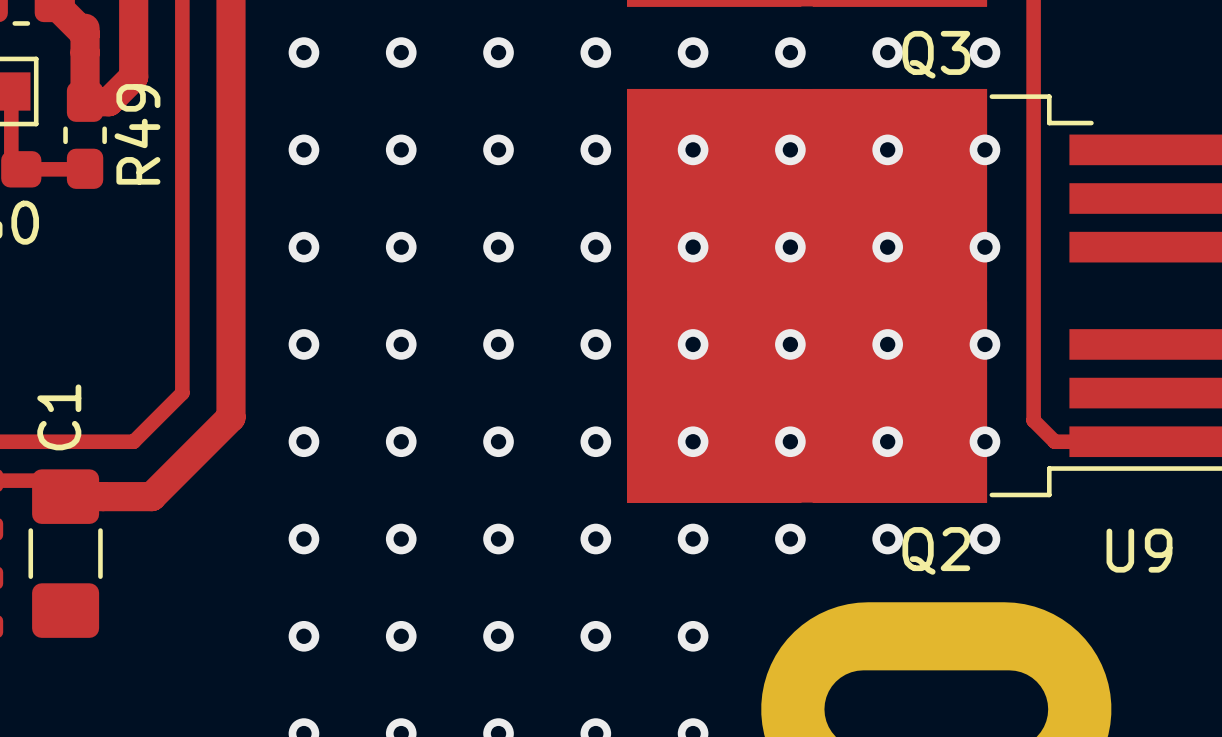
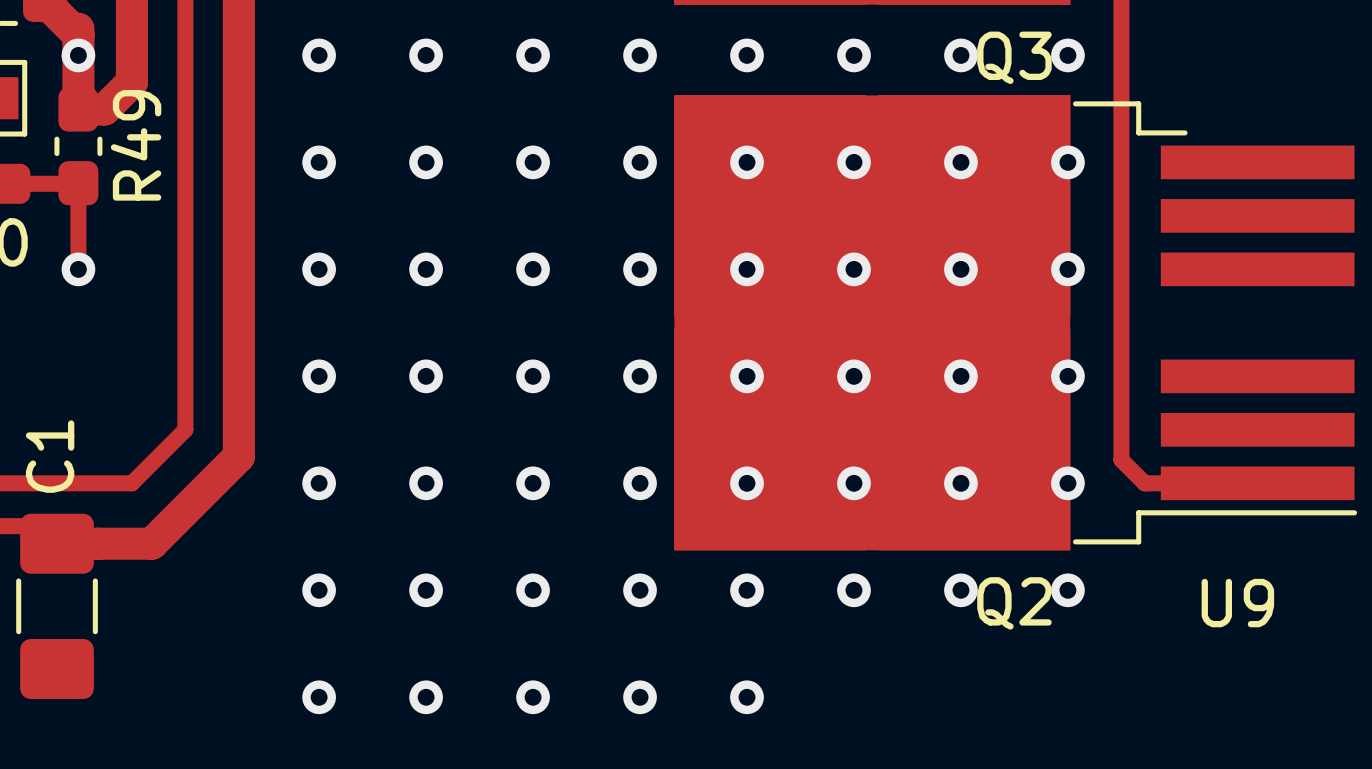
via: none -> (78, 55)
track: none -> (78, 183) (78, 269)
via: none -> (78, 269)

